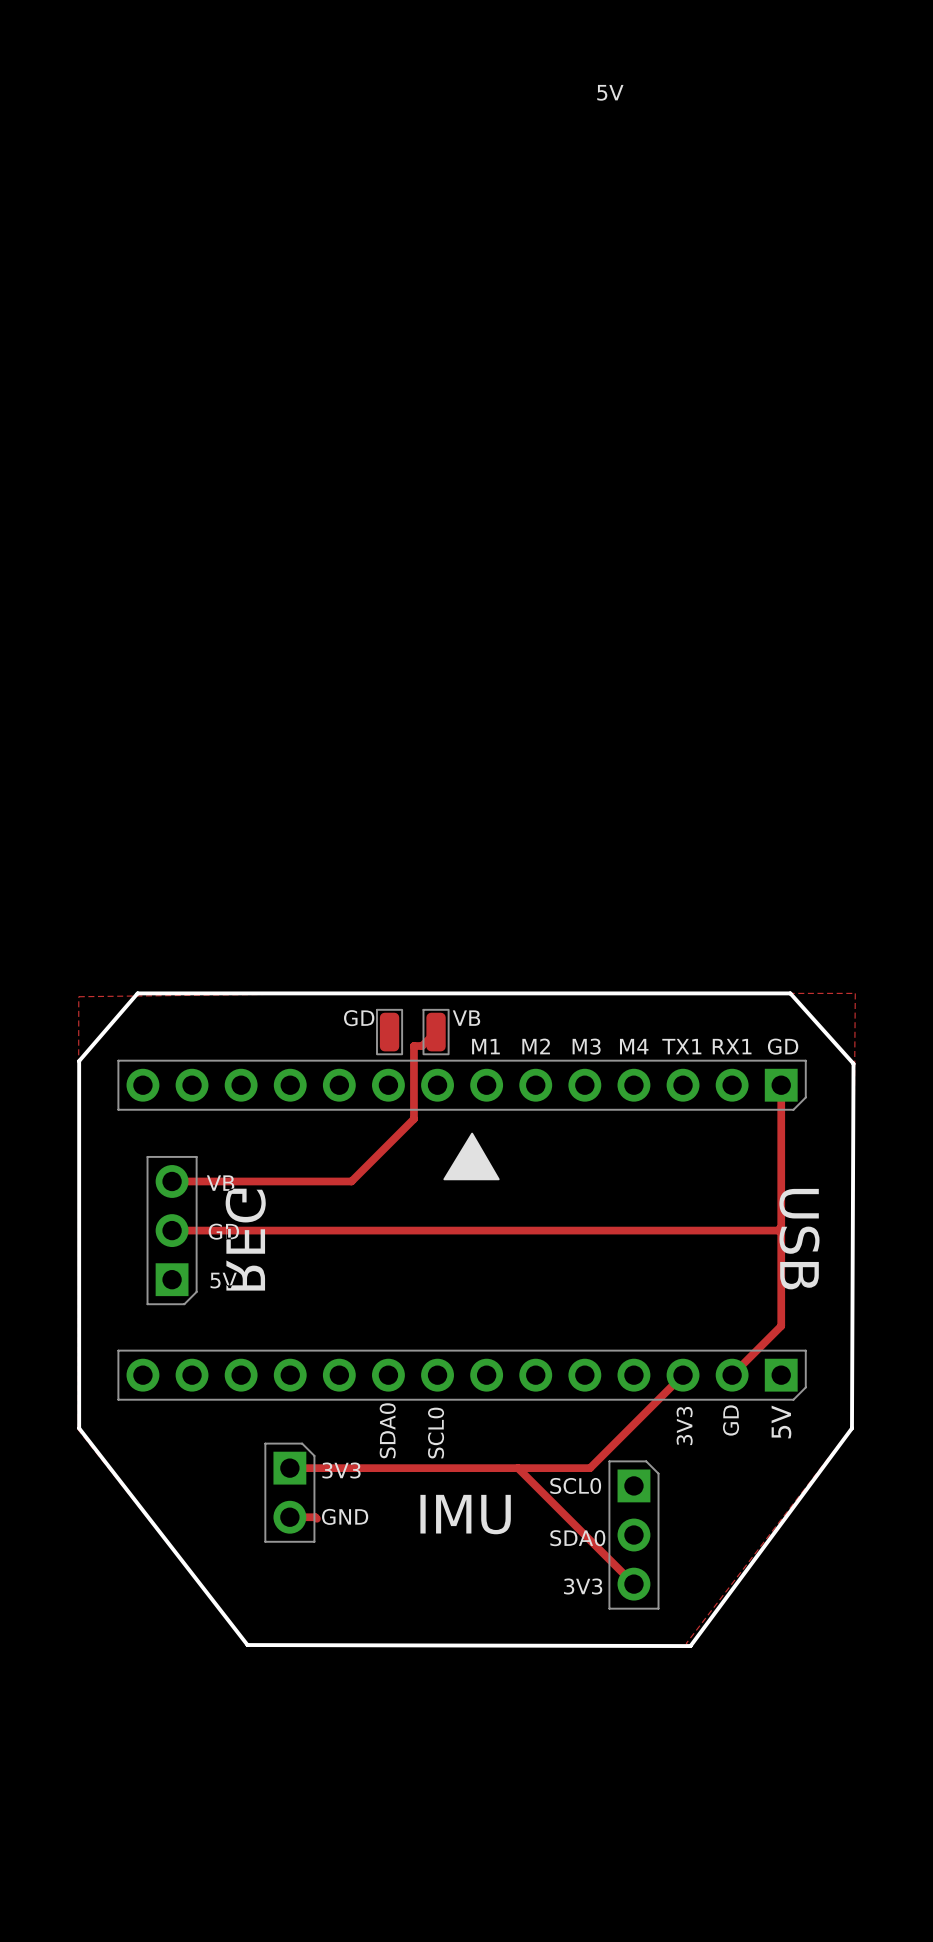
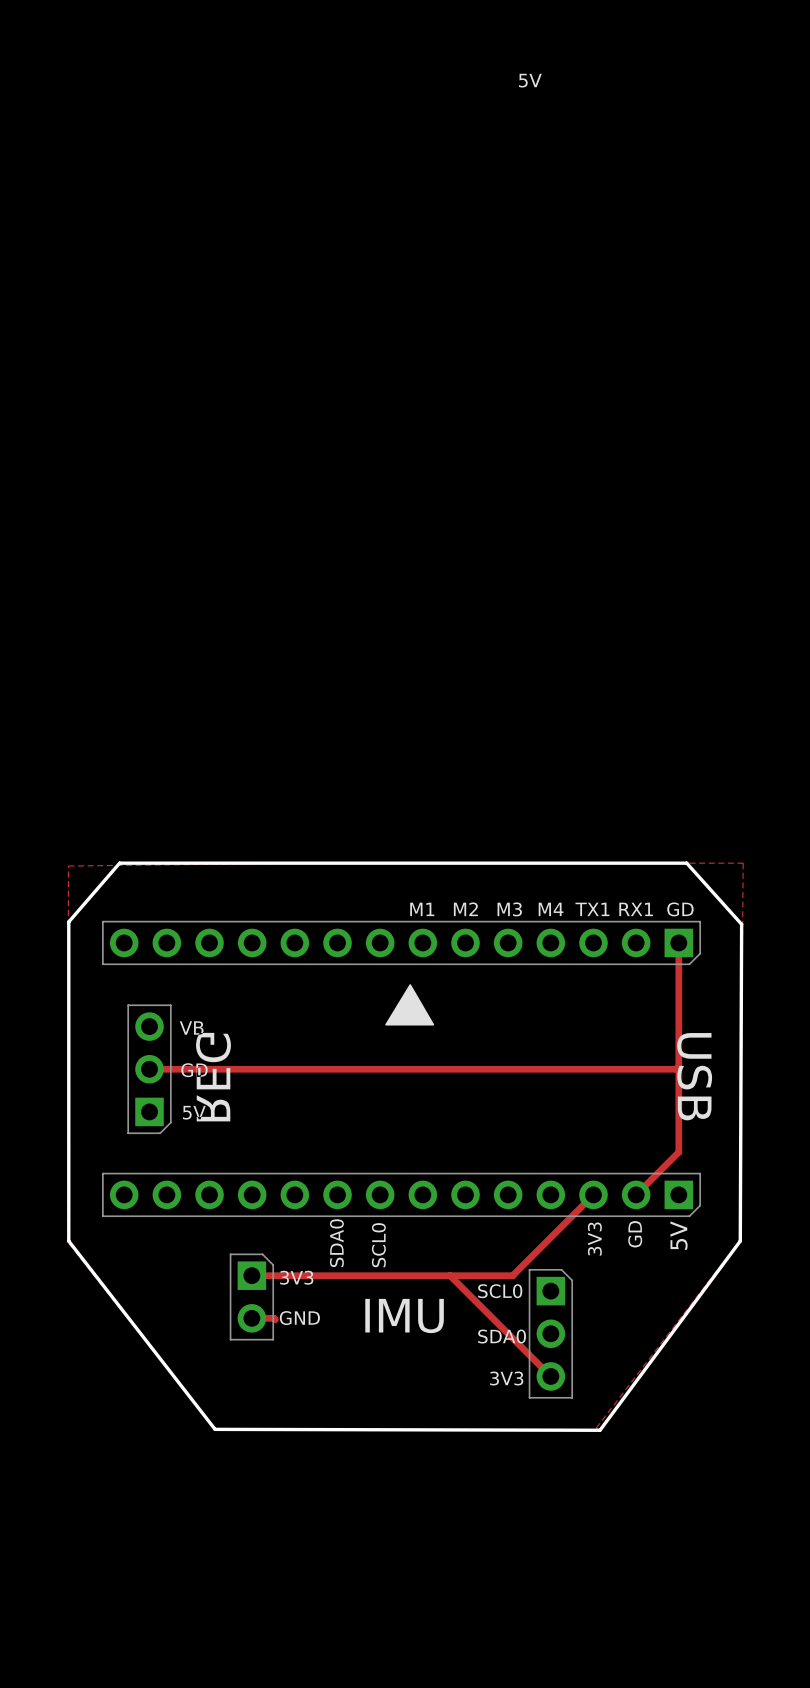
text: GD (359, 1018) -> none
text: VB (466, 1018) -> none
part: (389, 1032) -> none
track: (436, 1032) (422, 1046) (413, 1046) (413, 1119) (351, 1181) (172, 1181) -> none
part: (436, 1032) -> none

